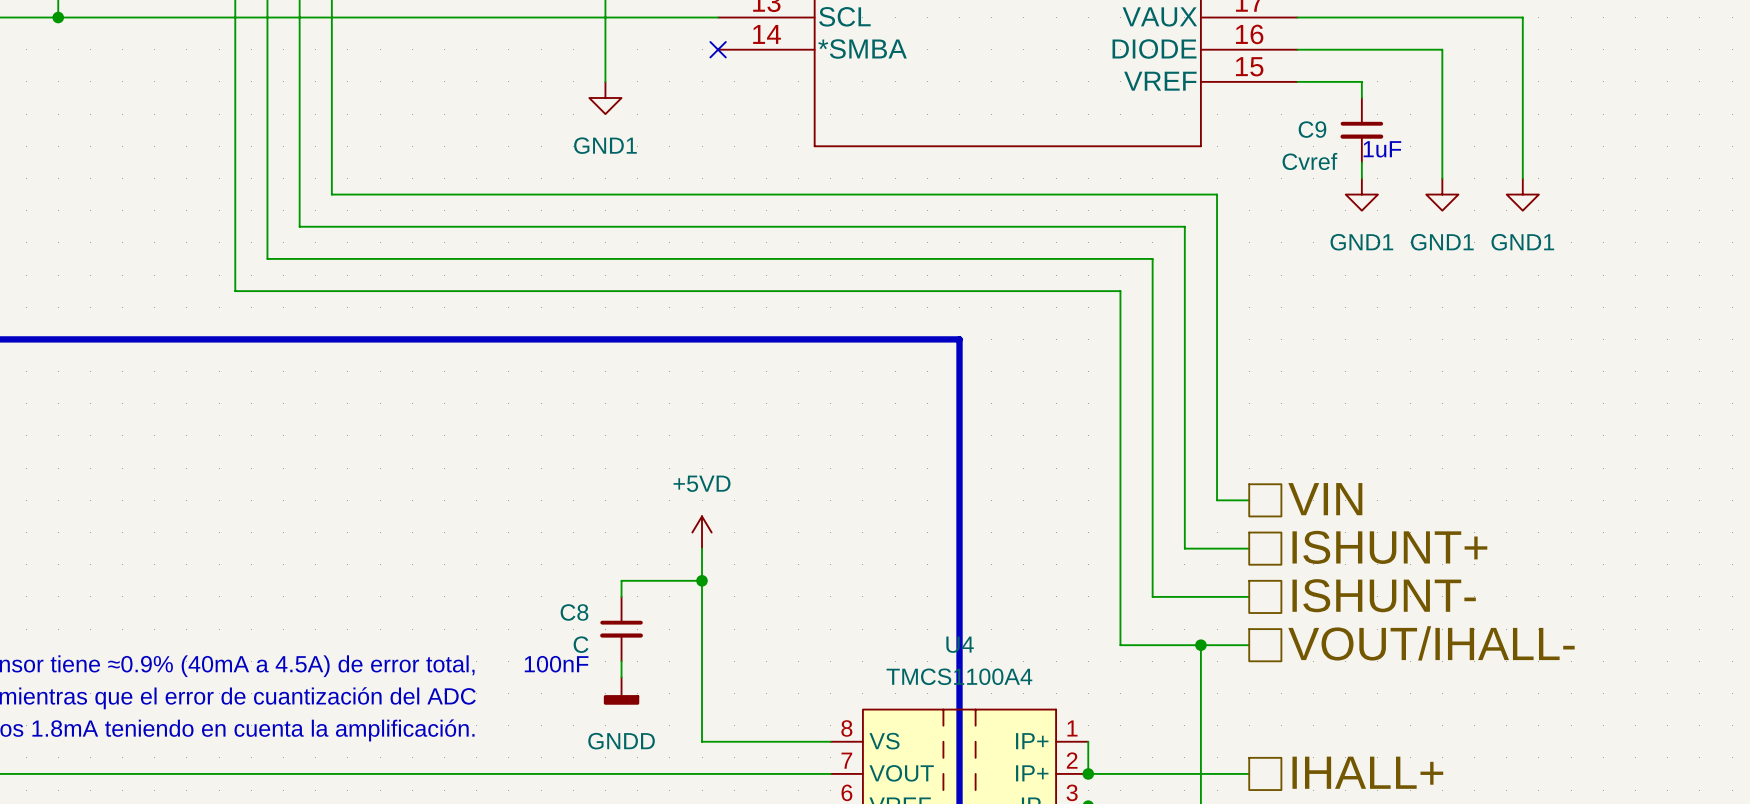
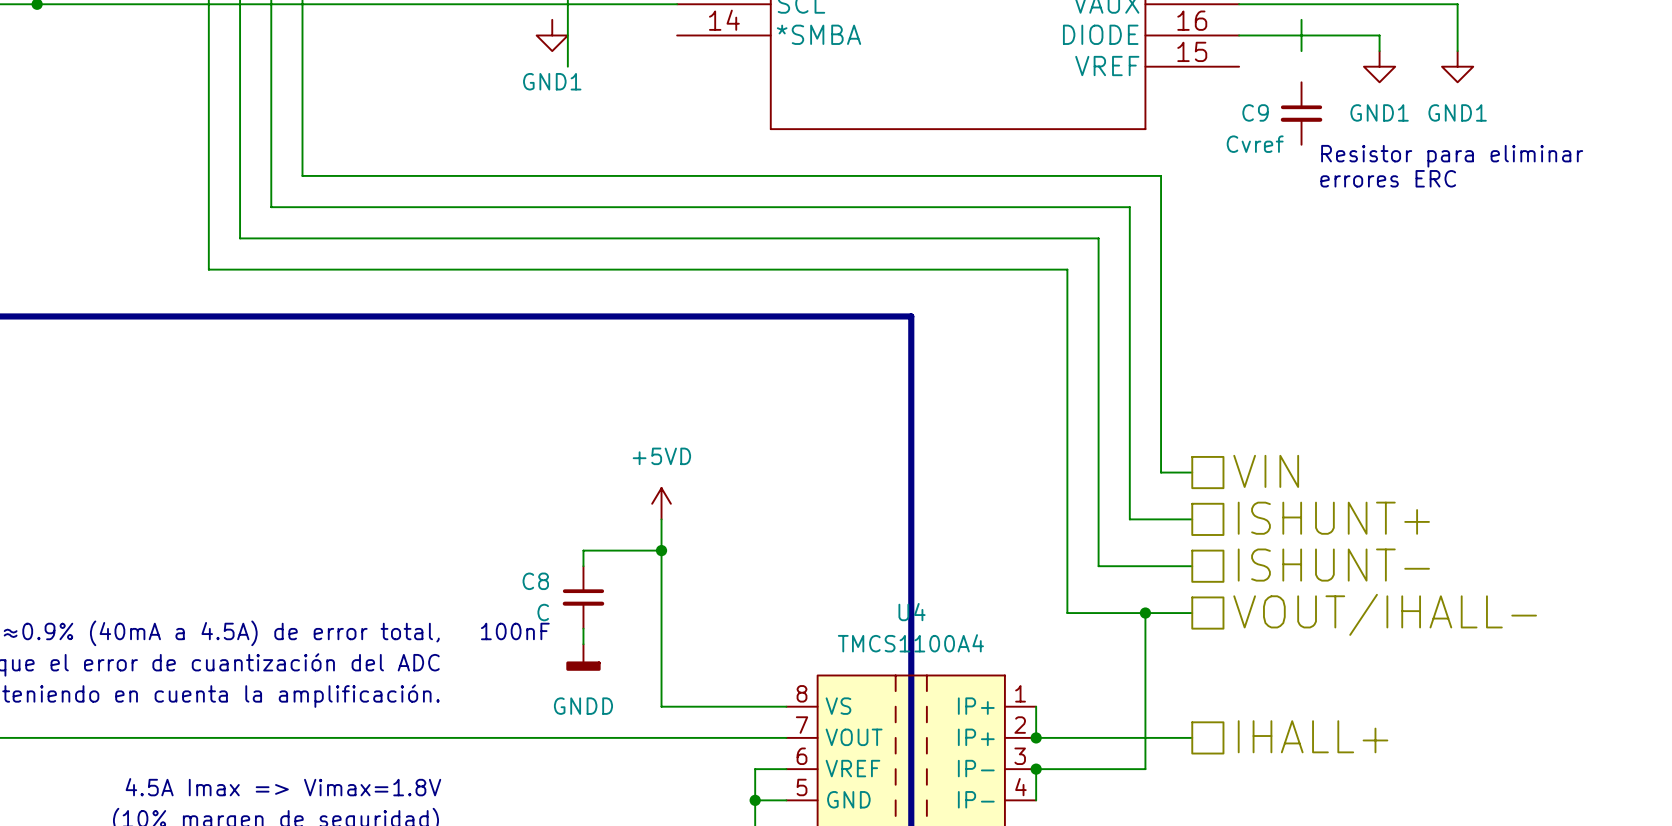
wire: none -> (1301, 19) (1301, 51)
no-connect mark: (718, 49) -> none
wire: (1442, 65) (1442, 178) -> none
wire: (1522, 65) (1522, 178) -> none
wire: (1297, 81) (1361, 81) (1361, 97) -> none
power symbol: none -> GND1 (1379, 66)
power symbol: none -> GND1 (1457, 66)
power symbol position: GND1 (605, 97) -> GND1 (552, 35)
text: 1uF (1382, 149) -> none
wire: (1361, 162) (1361, 178) -> none
text: none -> Resistor para eliminar (1452, 156)
power symbol: GND1 (1361, 194) -> none
power symbol: GND1 (1442, 194) -> none
power symbol: GND1 (1522, 194) -> none
text: none -> errores ERC (1388, 178)

